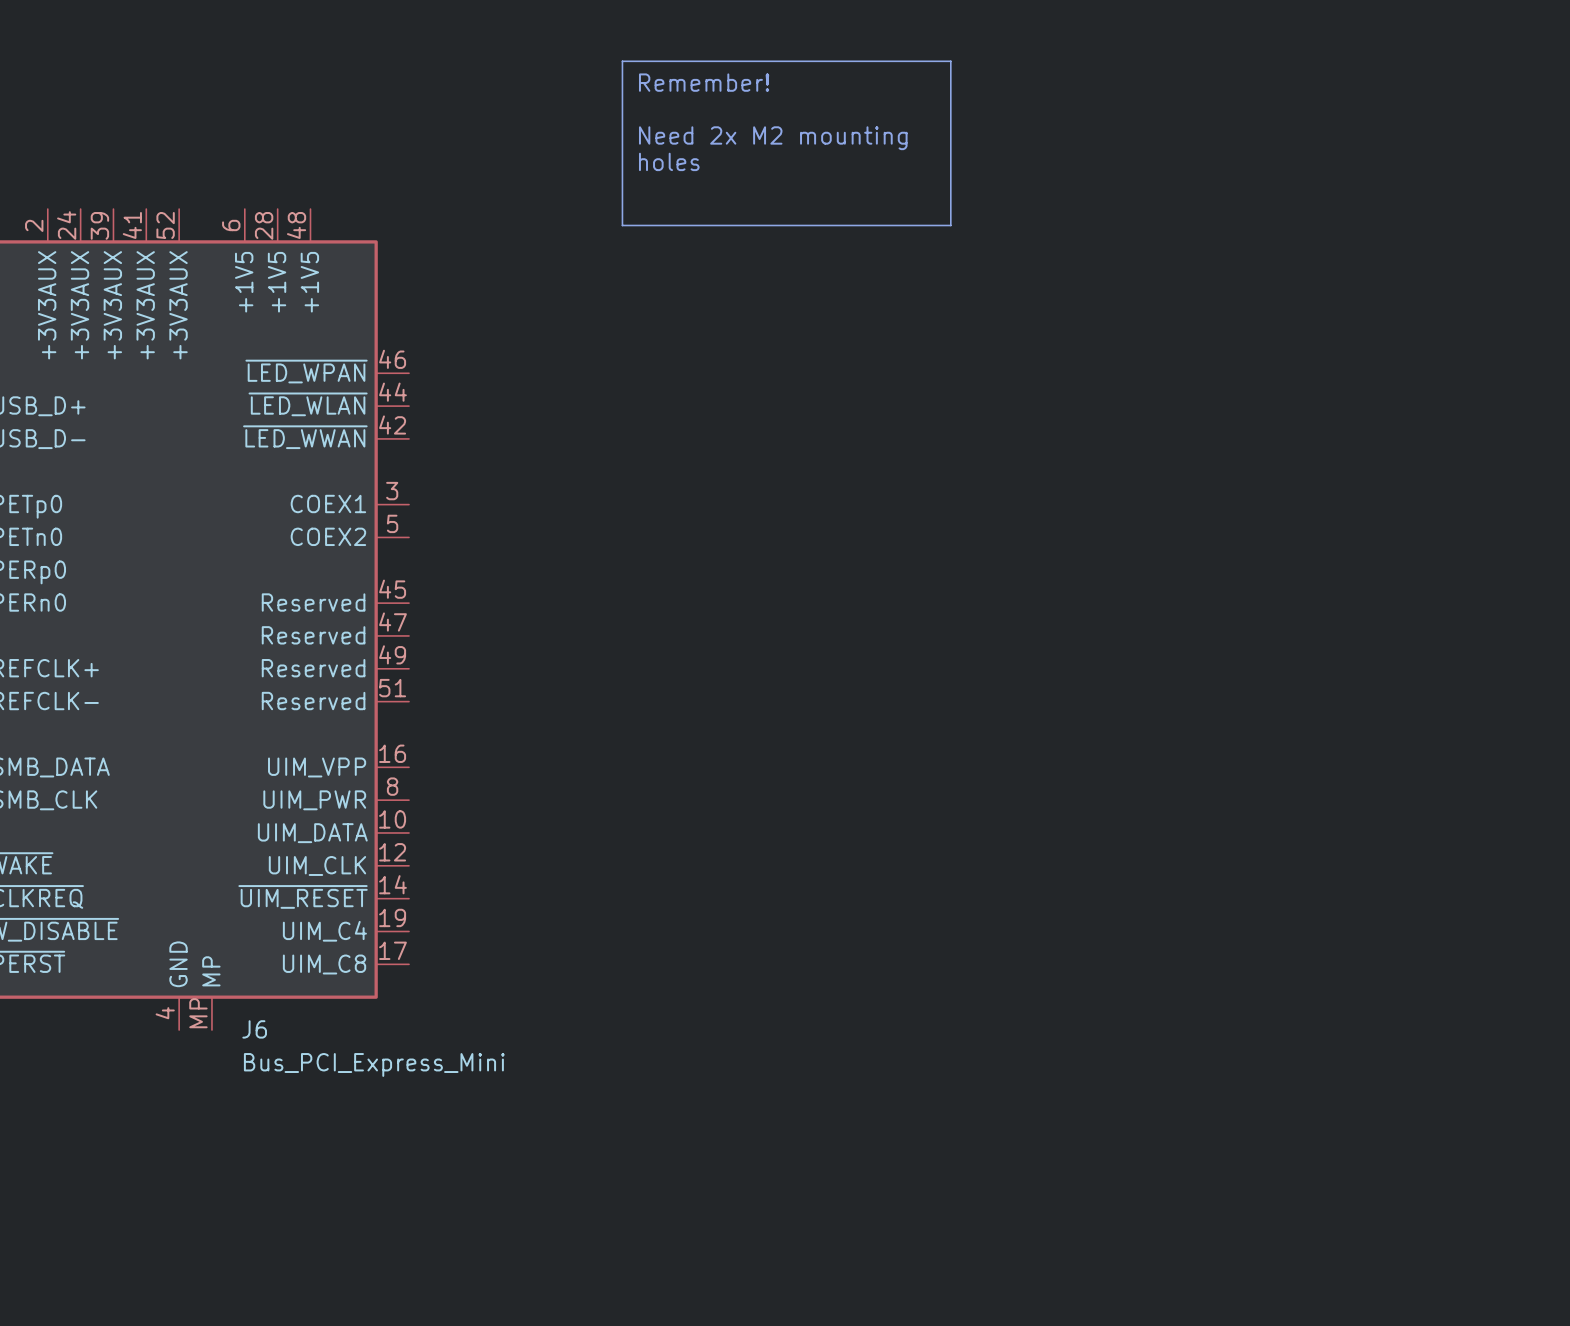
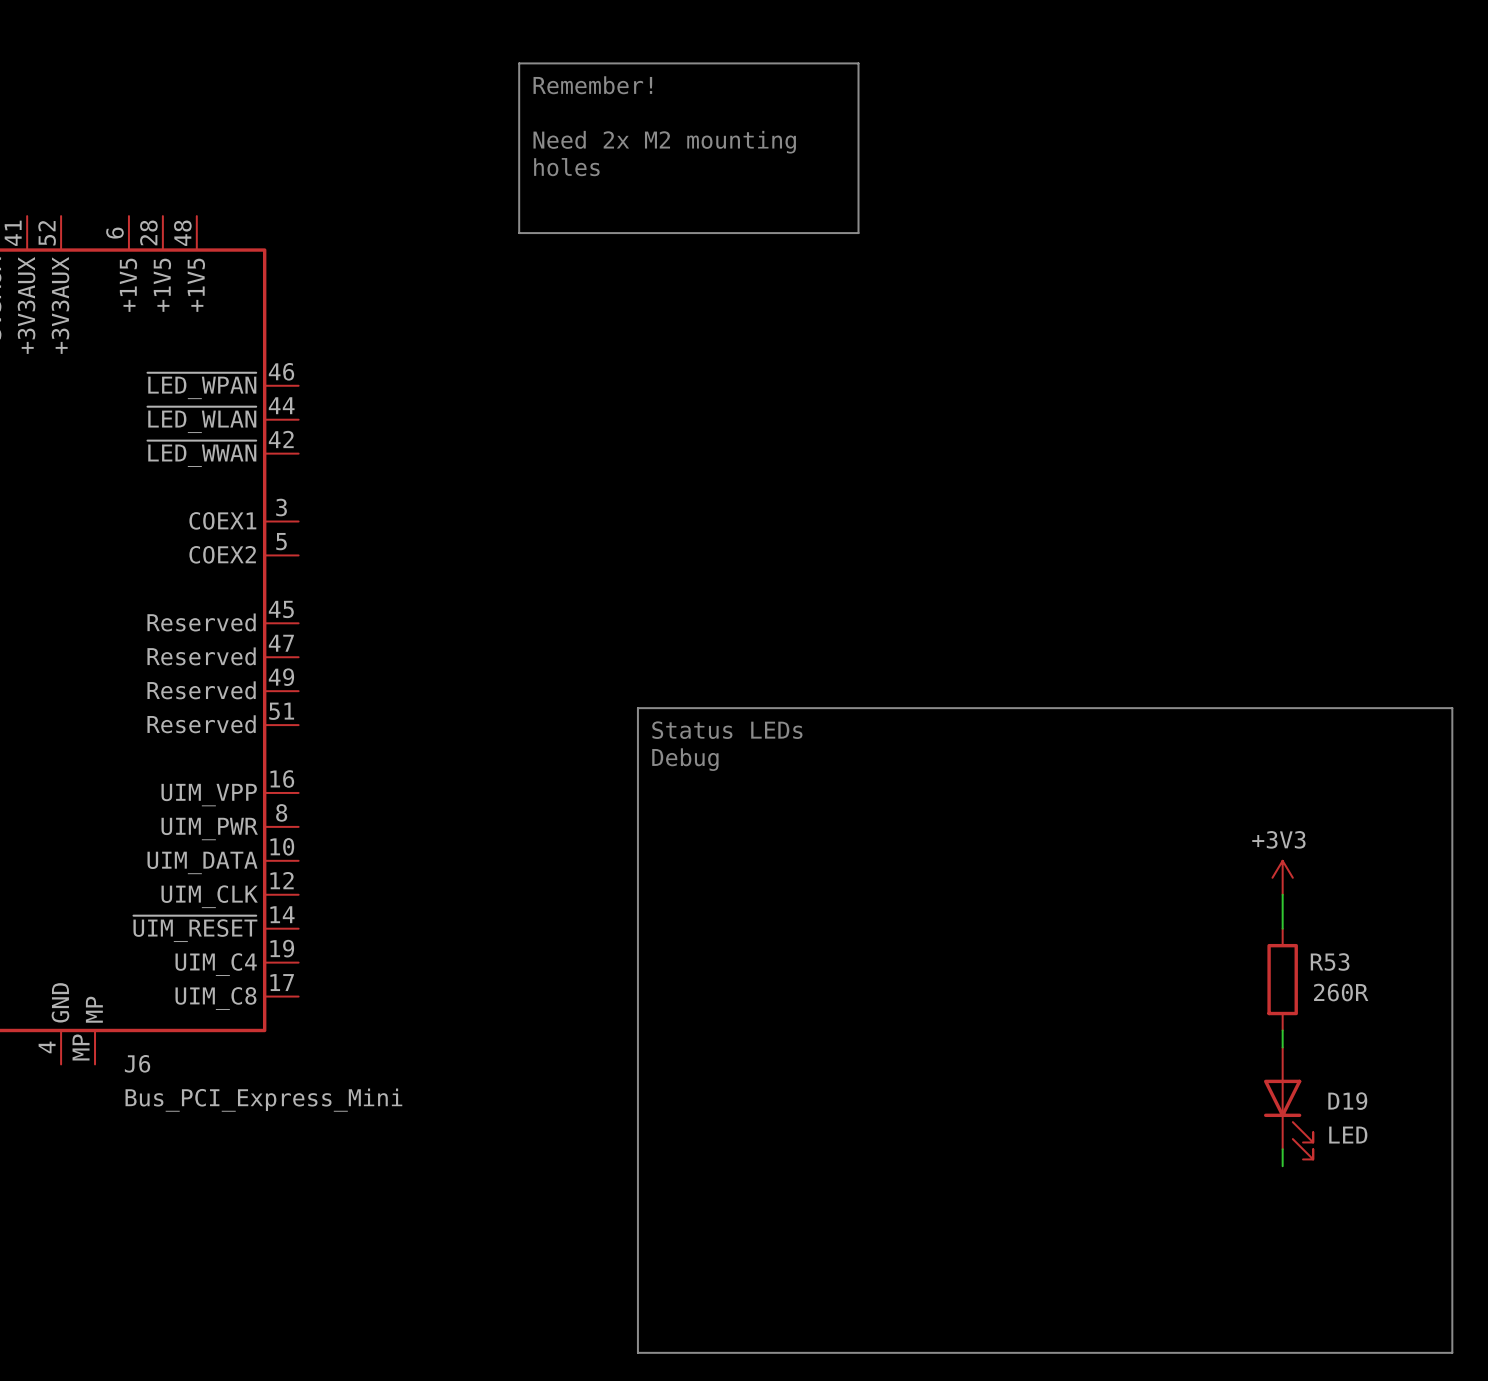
line: none -> (637, 708) (1452, 708) (1452, 1352) (637, 1352) (637, 708)
text: none -> Status LEDs (727, 730)
text: none -> Debug (685, 759)
power symbol: none -> +3V3 (1282, 877)
wire: none -> (1282, 894) (1282, 928)
R53: none -> 260R (1282, 979)
wire: none -> (1282, 1030) (1282, 1047)
D19: none -> LED (1288, 1103)
wire: none -> (1282, 1149) (1282, 1166)

